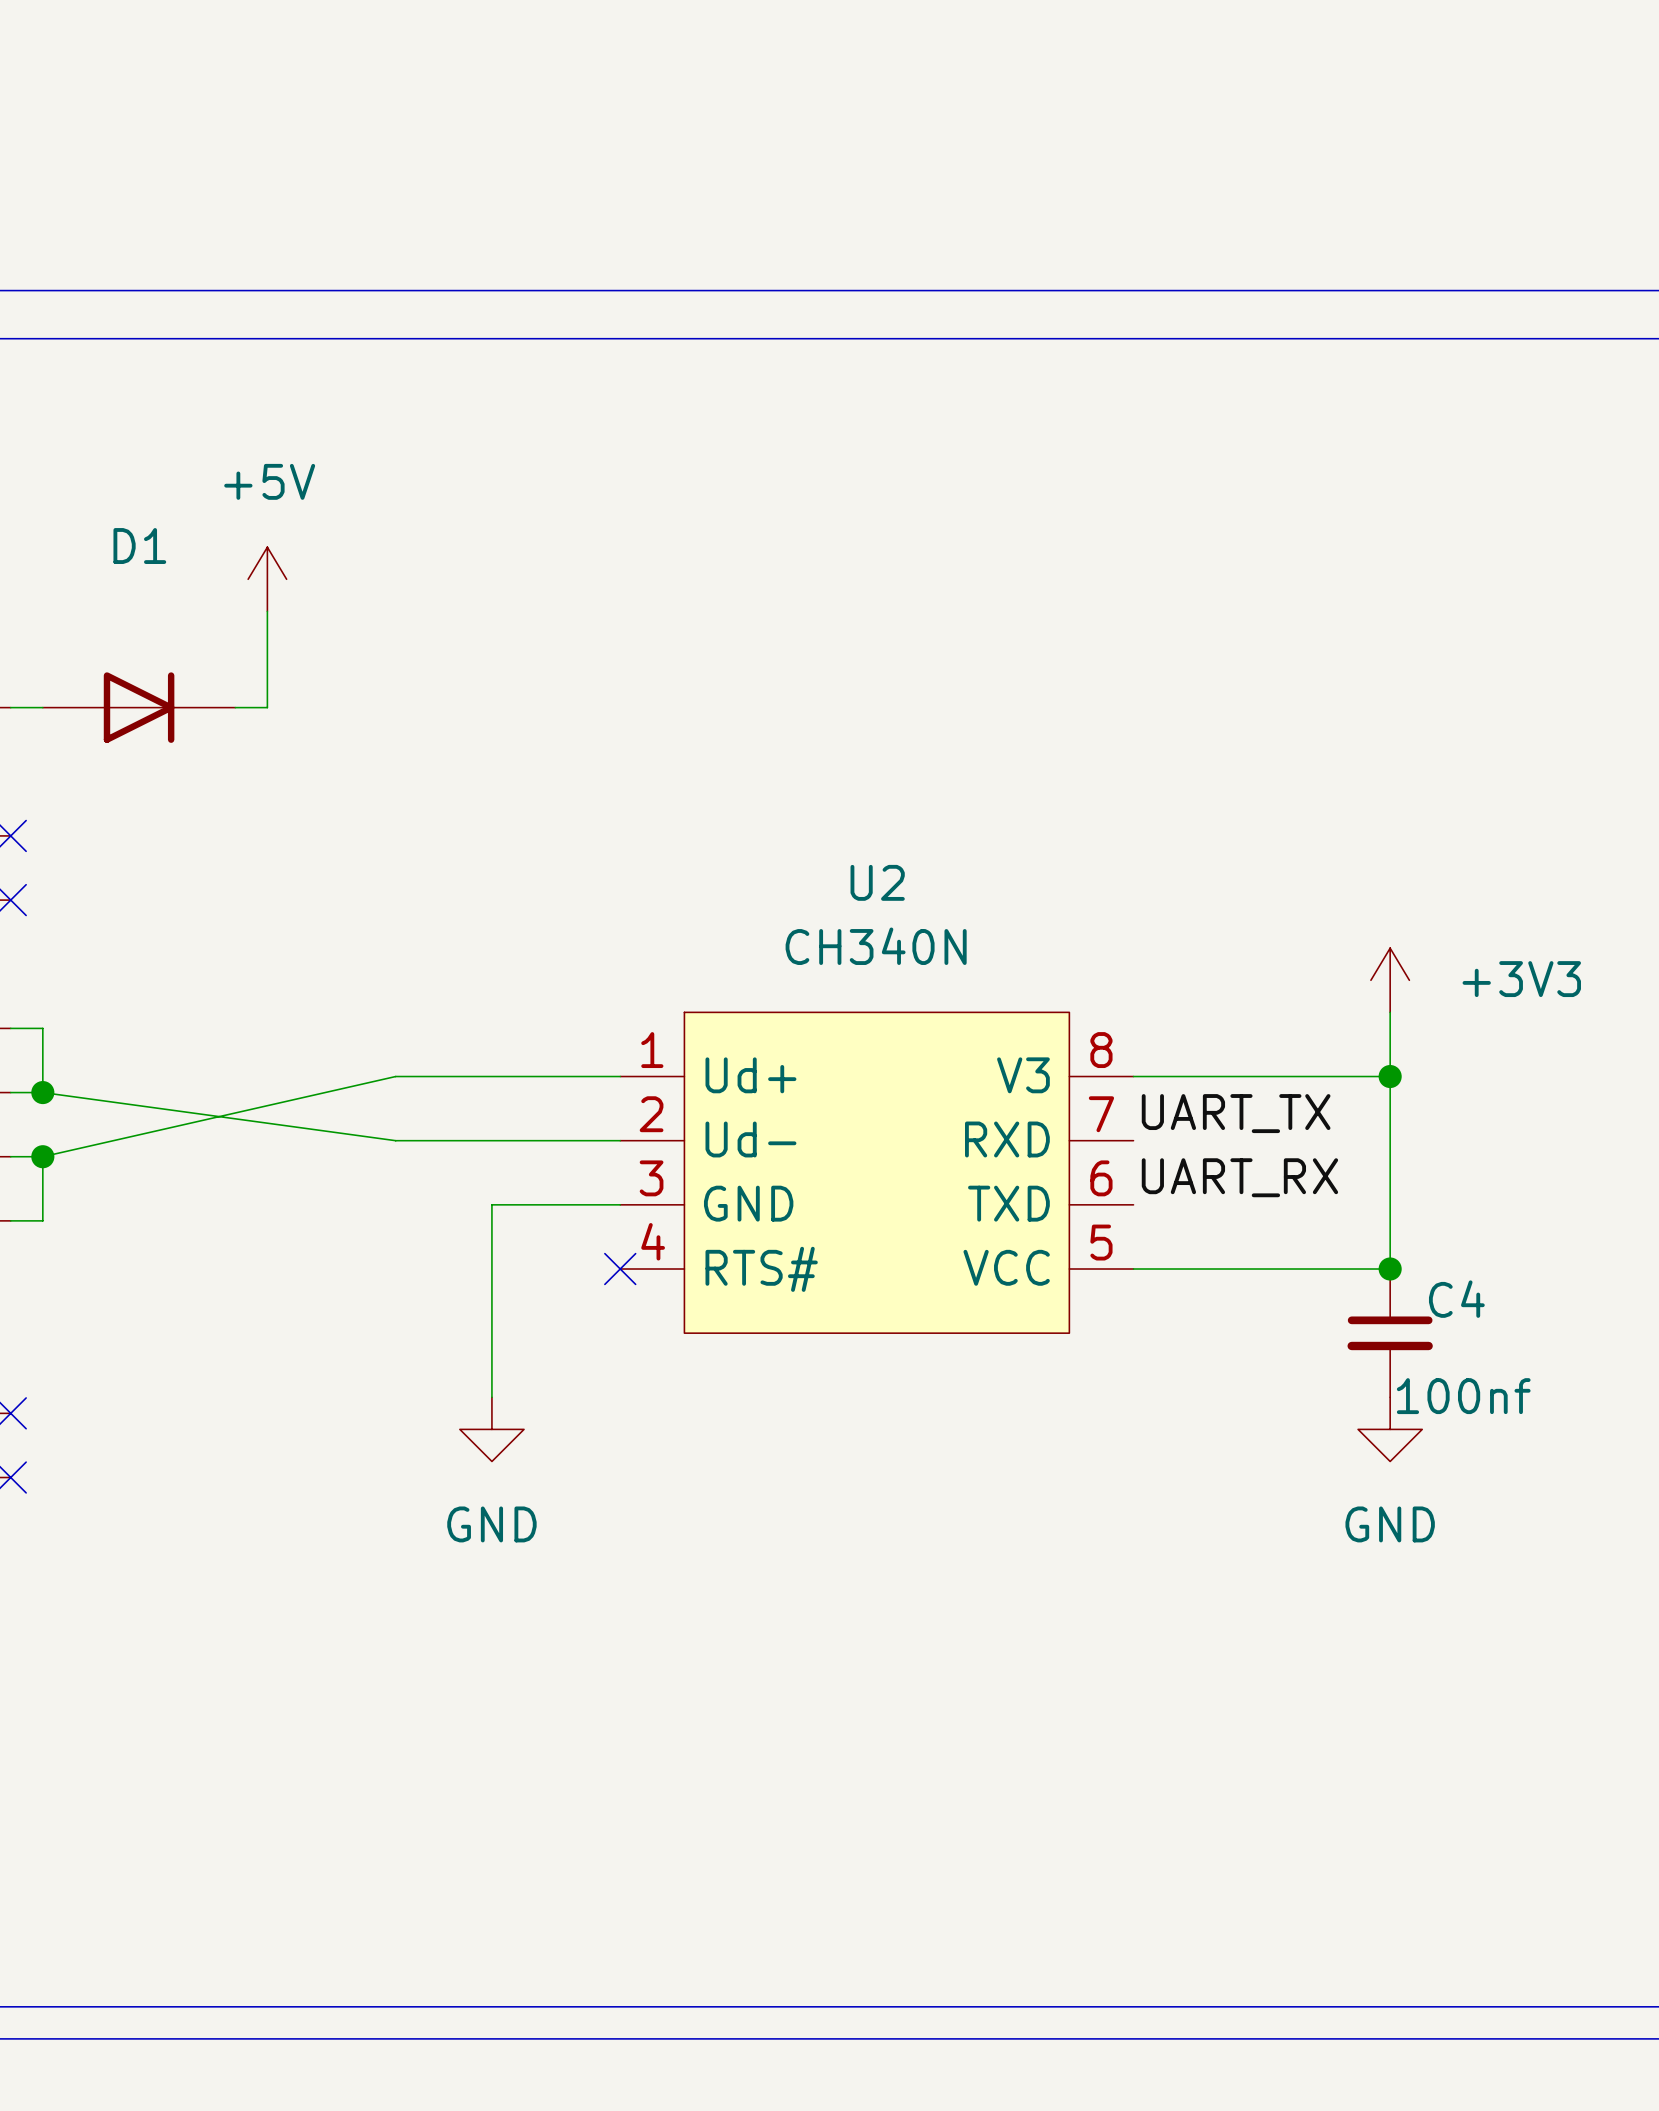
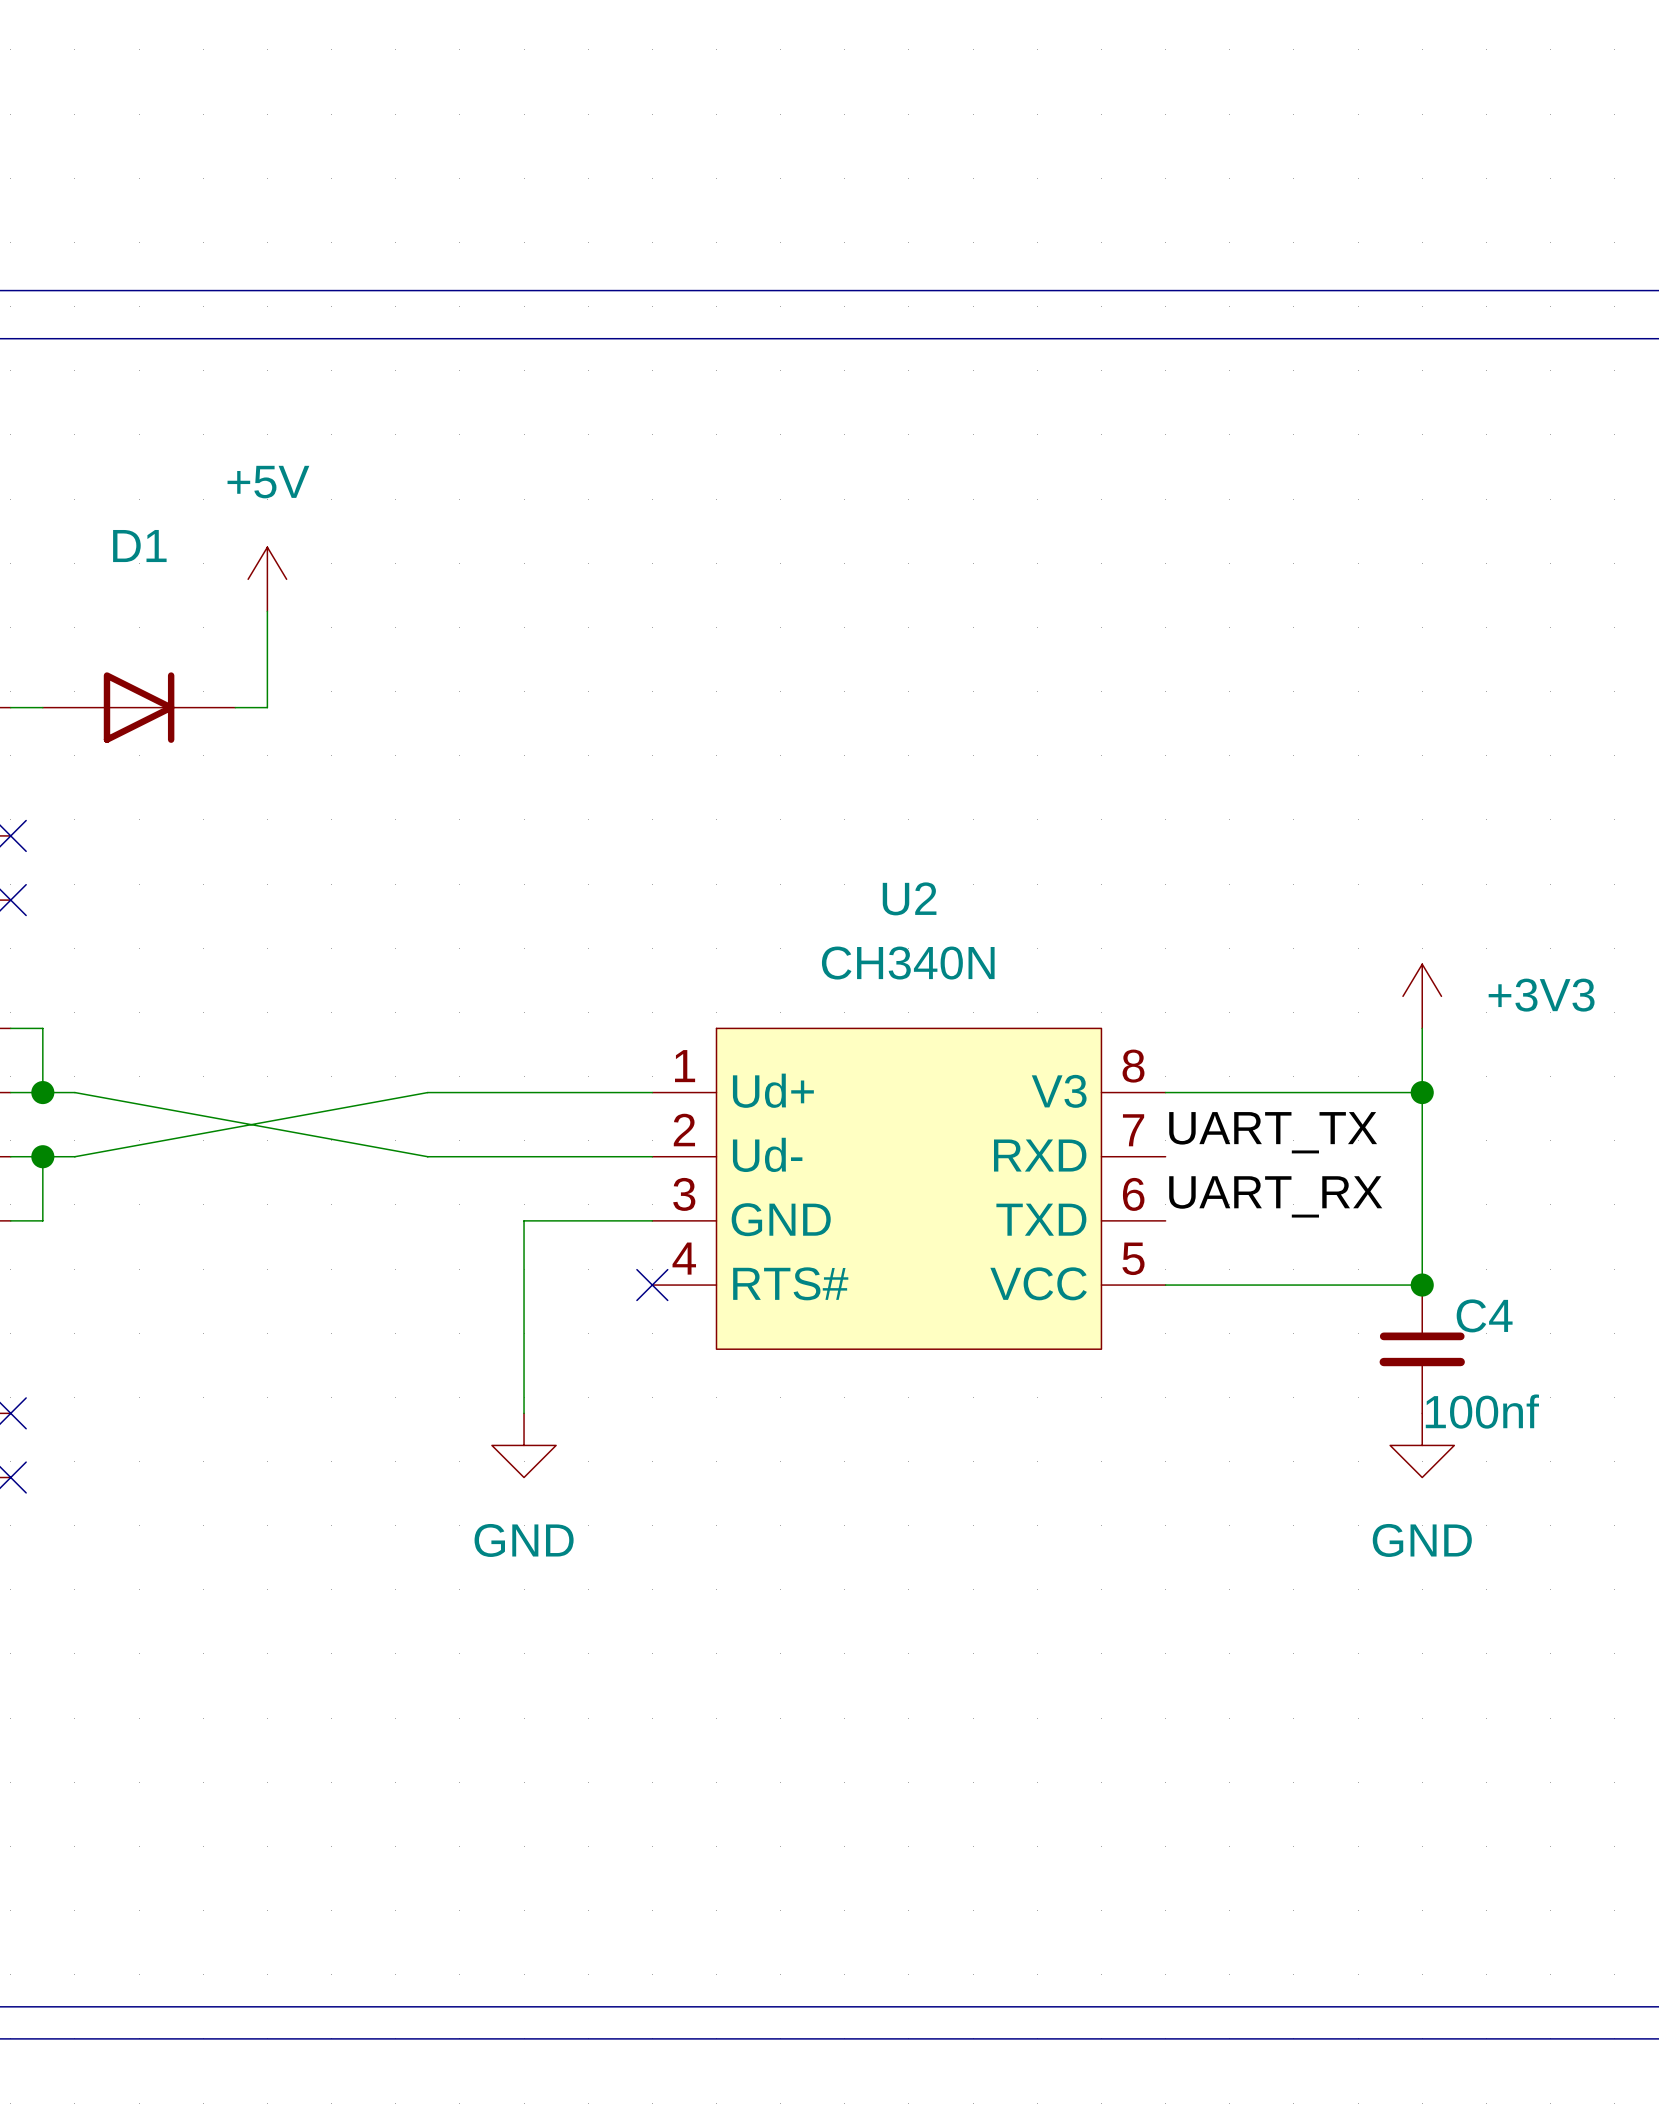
power symbol position: +3V3 (1390, 980) -> +3V3 (1422, 996)
wire: (1390, 1012) (1390, 1269) (1133, 1269) -> (1422, 1028) (1422, 1285) (1165, 1285)
wire: (620, 1076) (395, 1076) (42, 1156) -> (652, 1092) (427, 1092) (74, 1156) (42, 1156)
wire: (1133, 1076) (1390, 1076) -> (1165, 1092) (1422, 1092)
junction position: (1390, 1076) -> (1422, 1092)
wire: (42, 1092) (395, 1140) (620, 1140) -> (42, 1092) (74, 1092) (427, 1156) (652, 1156)
label position: UART_TX (1236, 1113) -> UART_TX (1273, 1132)
U2 position: (876, 1172) -> (908, 1188)
label position: UART_RX (1239, 1177) -> UART_RX (1275, 1196)
wire: (620, 1204) (491, 1204) (491, 1397) -> (652, 1220) (524, 1220) (524, 1413)
no-connect mark position: (620, 1269) -> (652, 1285)
junction position: (1390, 1269) -> (1422, 1285)
C4 position: (1390, 1333) -> (1422, 1349)
power symbol position: GND (491, 1429) -> GND (524, 1445)
power symbol position: GND (1390, 1429) -> GND (1422, 1445)

